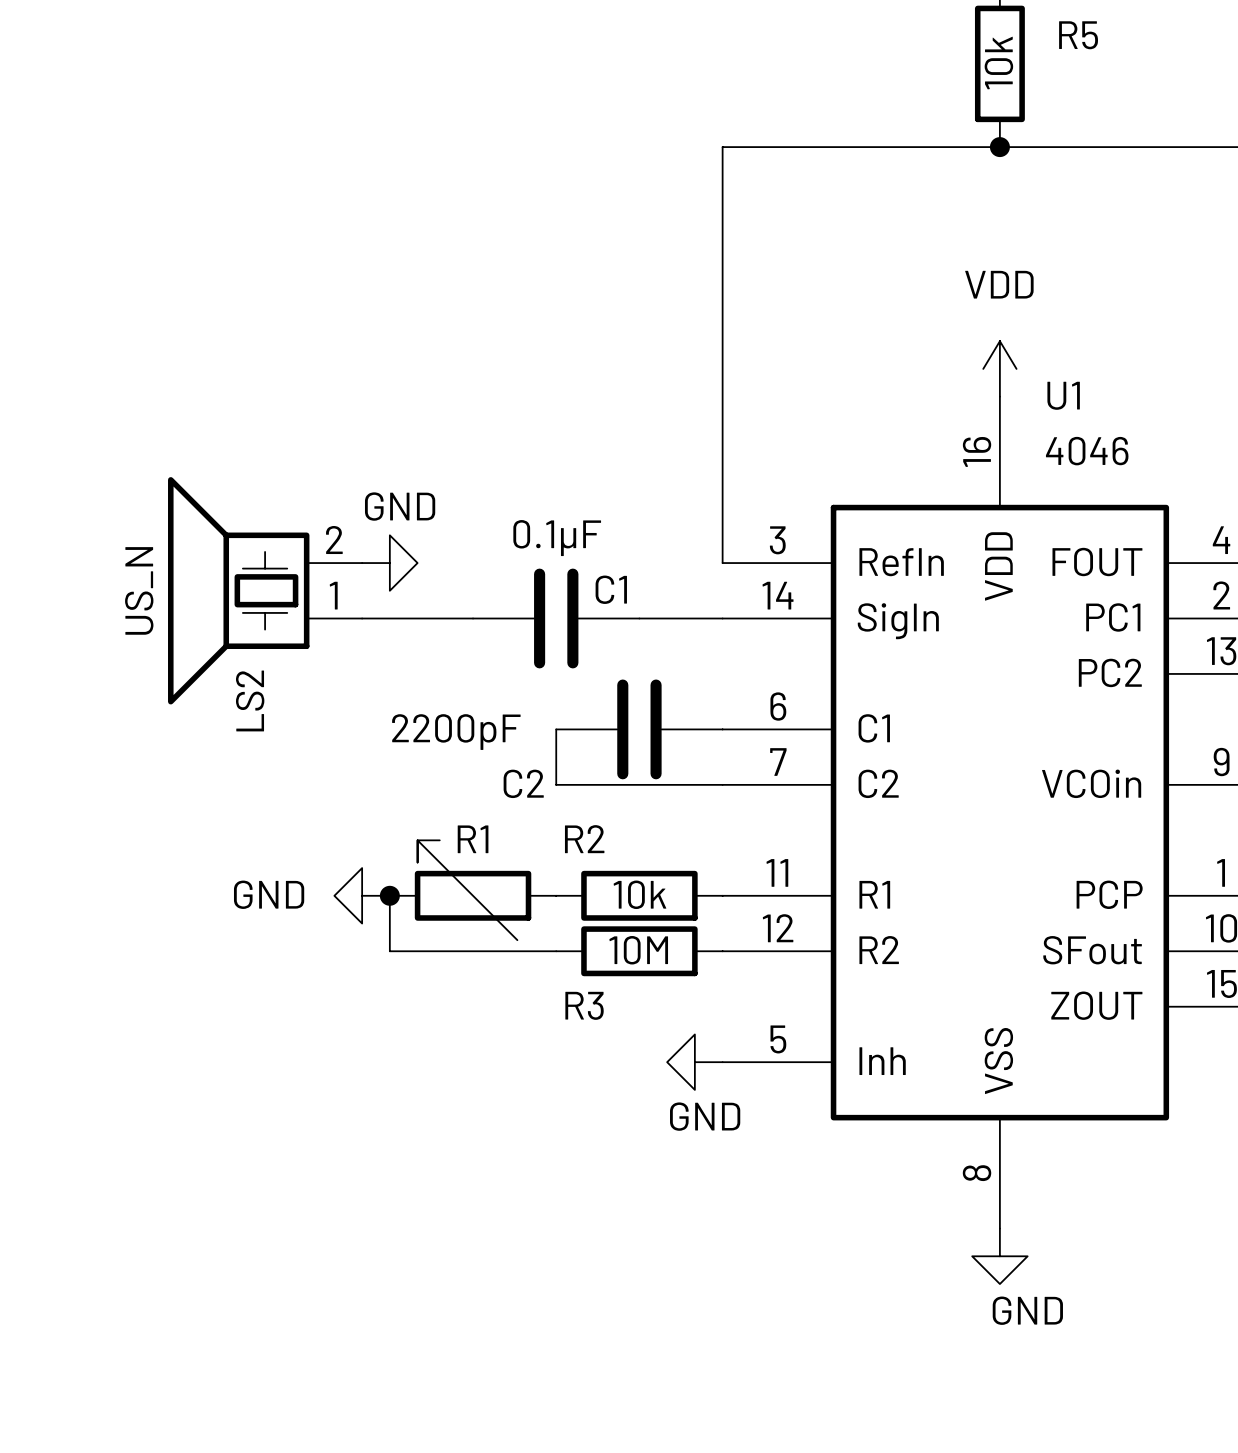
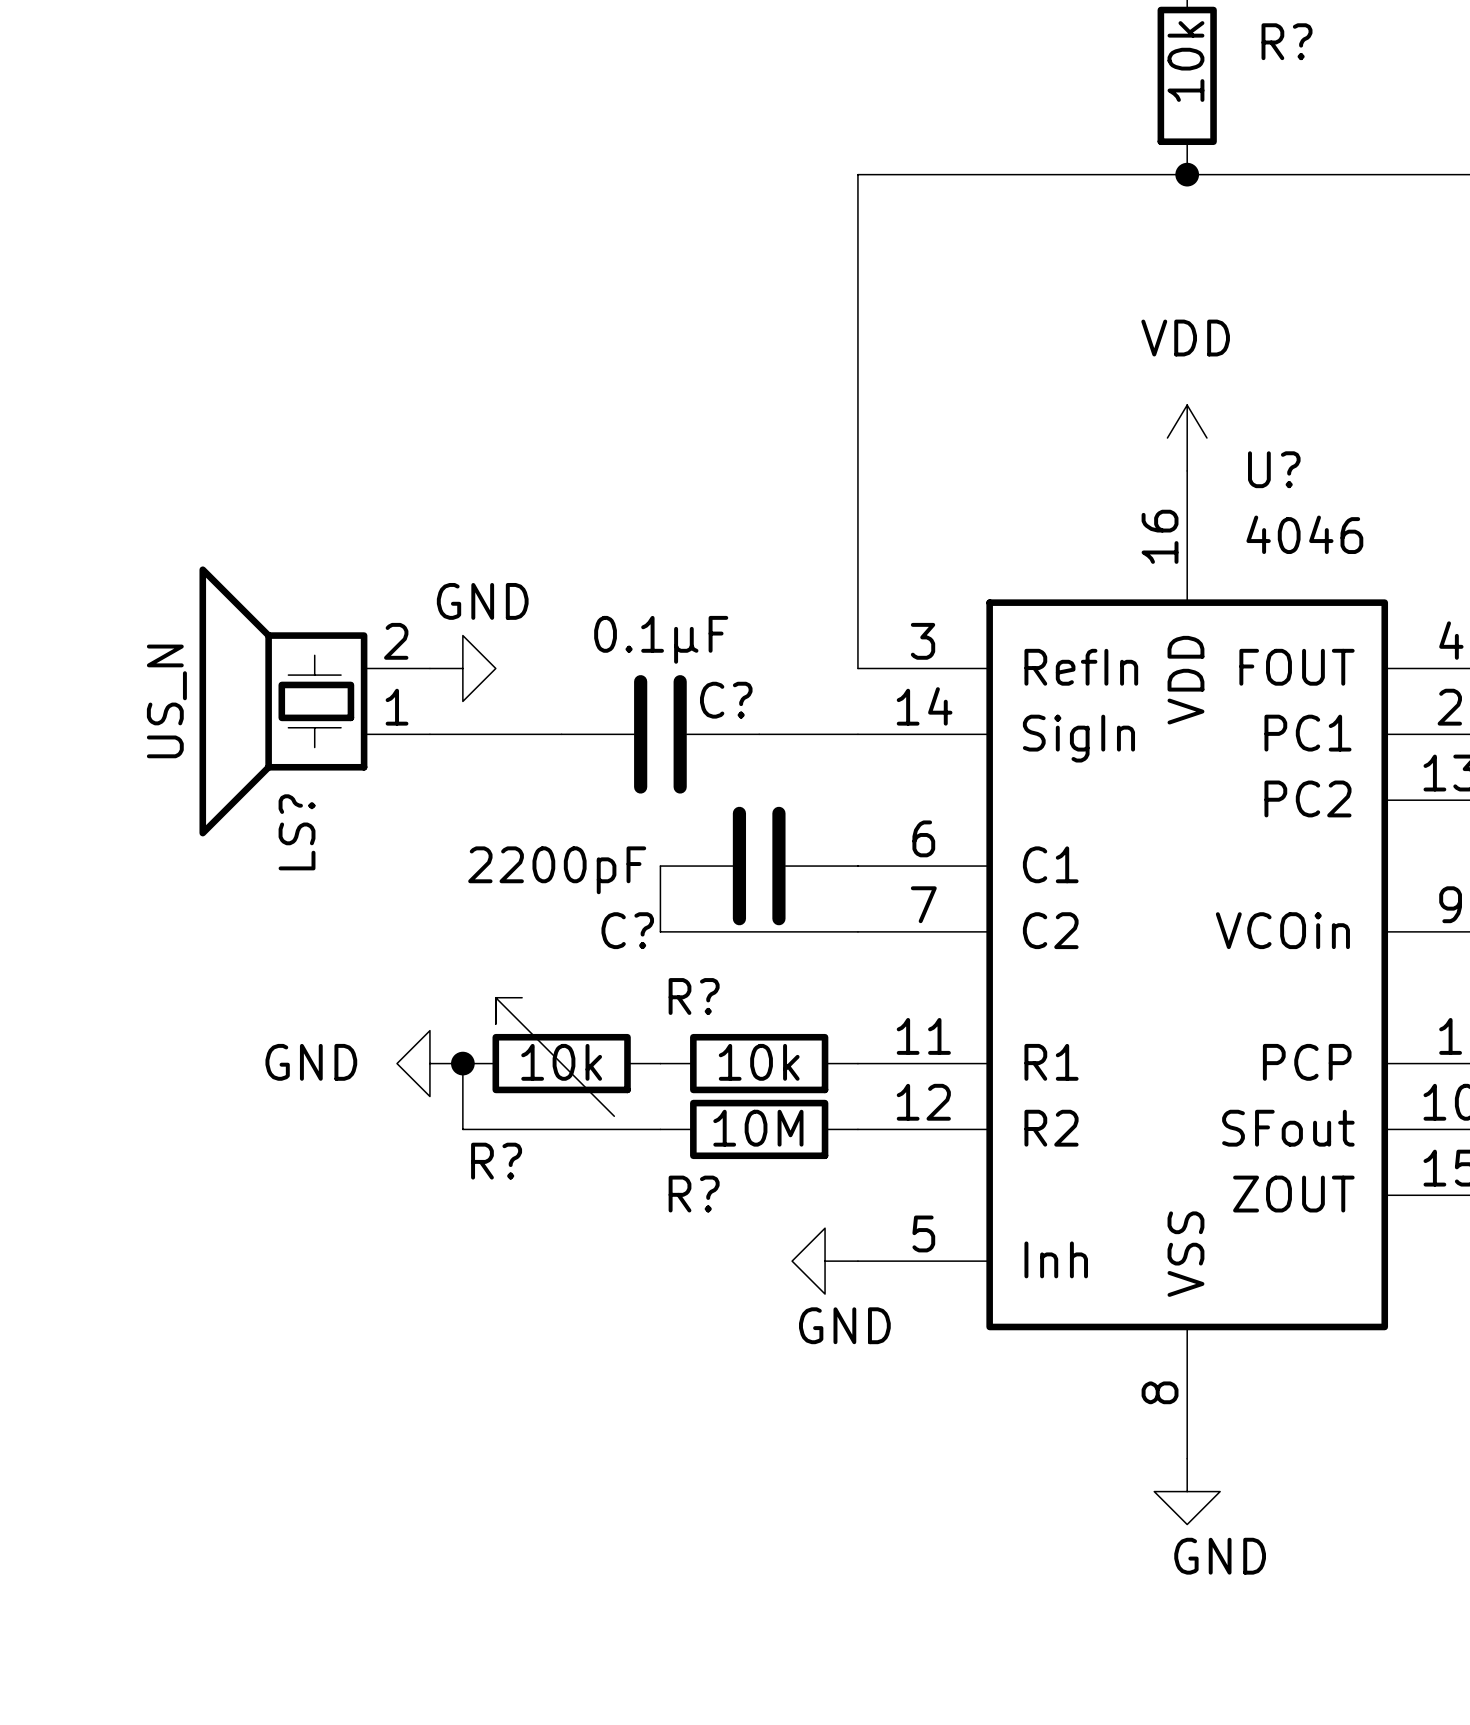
R5 name: R5 (1078, 35) -> R? (1287, 41)
U1 name: U1 (1063, 395) -> U? (1274, 469)
C1 name: C1 (611, 589) -> C? (726, 700)
LS2 name: LS2 (250, 700) -> LS? (297, 832)
C2 name: C2 (523, 783) -> C? (627, 930)
R1 name: R1 (473, 839) -> R? (496, 1161)
R2 name: R2 (584, 839) -> R? (694, 996)
R1 value: none -> 10k (561, 1062)
R3 name: R3 (584, 1005) -> R? (694, 1194)

